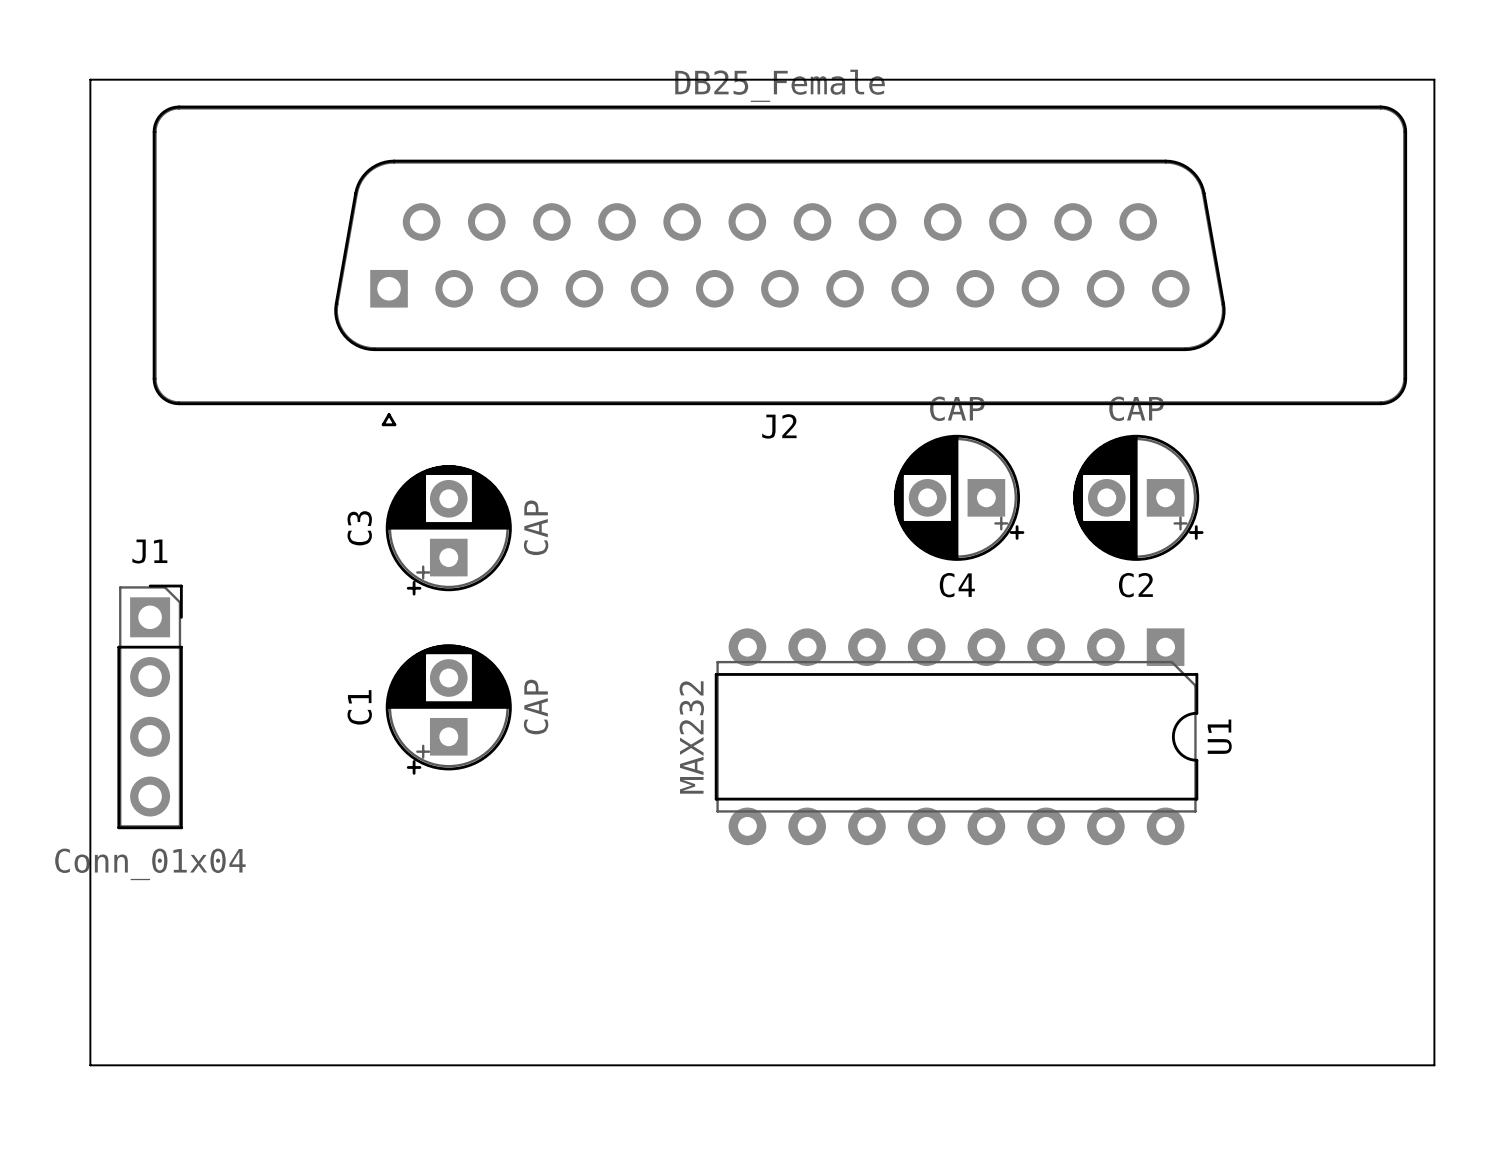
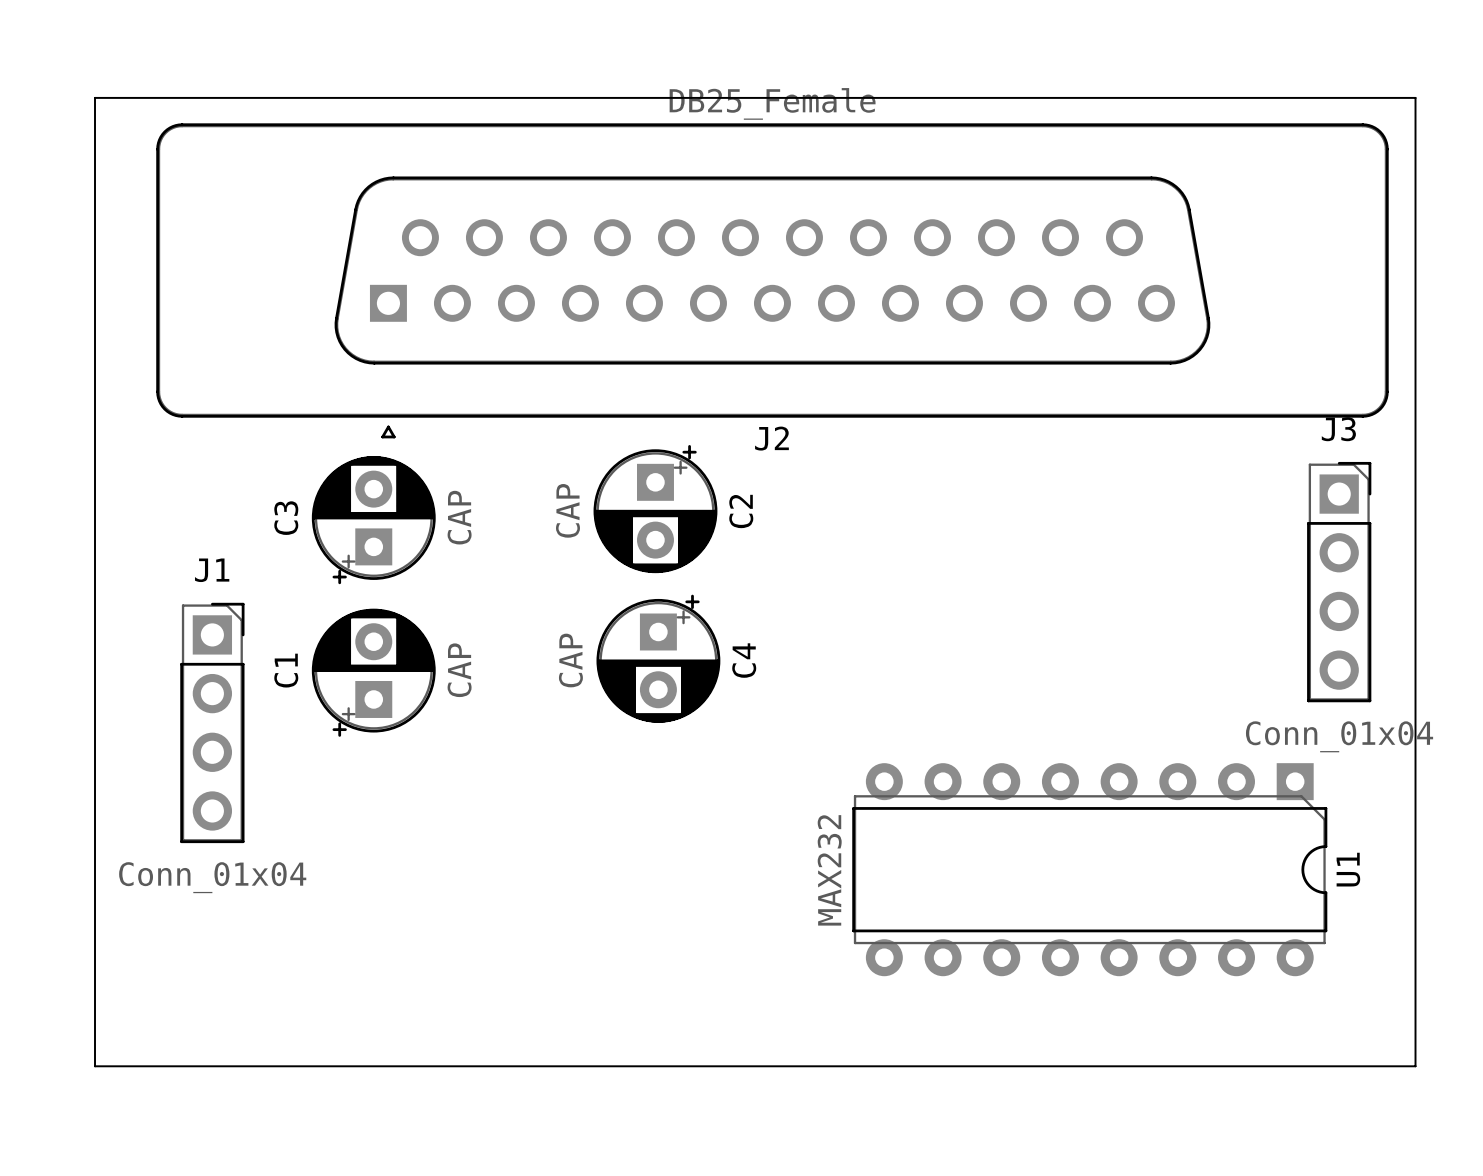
C4 rotation: 0° (959, 497) -> 90° counterclockwise (658, 658)
C4 position: (959, 497) -> (658, 658)
C2 rotation: 0° (1138, 497) -> 90° counterclockwise (655, 509)
C2 position: (1138, 497) -> (655, 509)
C3 position: (448, 530) -> (373, 520)
J3: none -> Conn_01x04 (1339, 582)
J1 position: (150, 706) -> (212, 722)
C1 position: (448, 709) -> (373, 672)
U1 position: (956, 736) -> (1089, 869)

